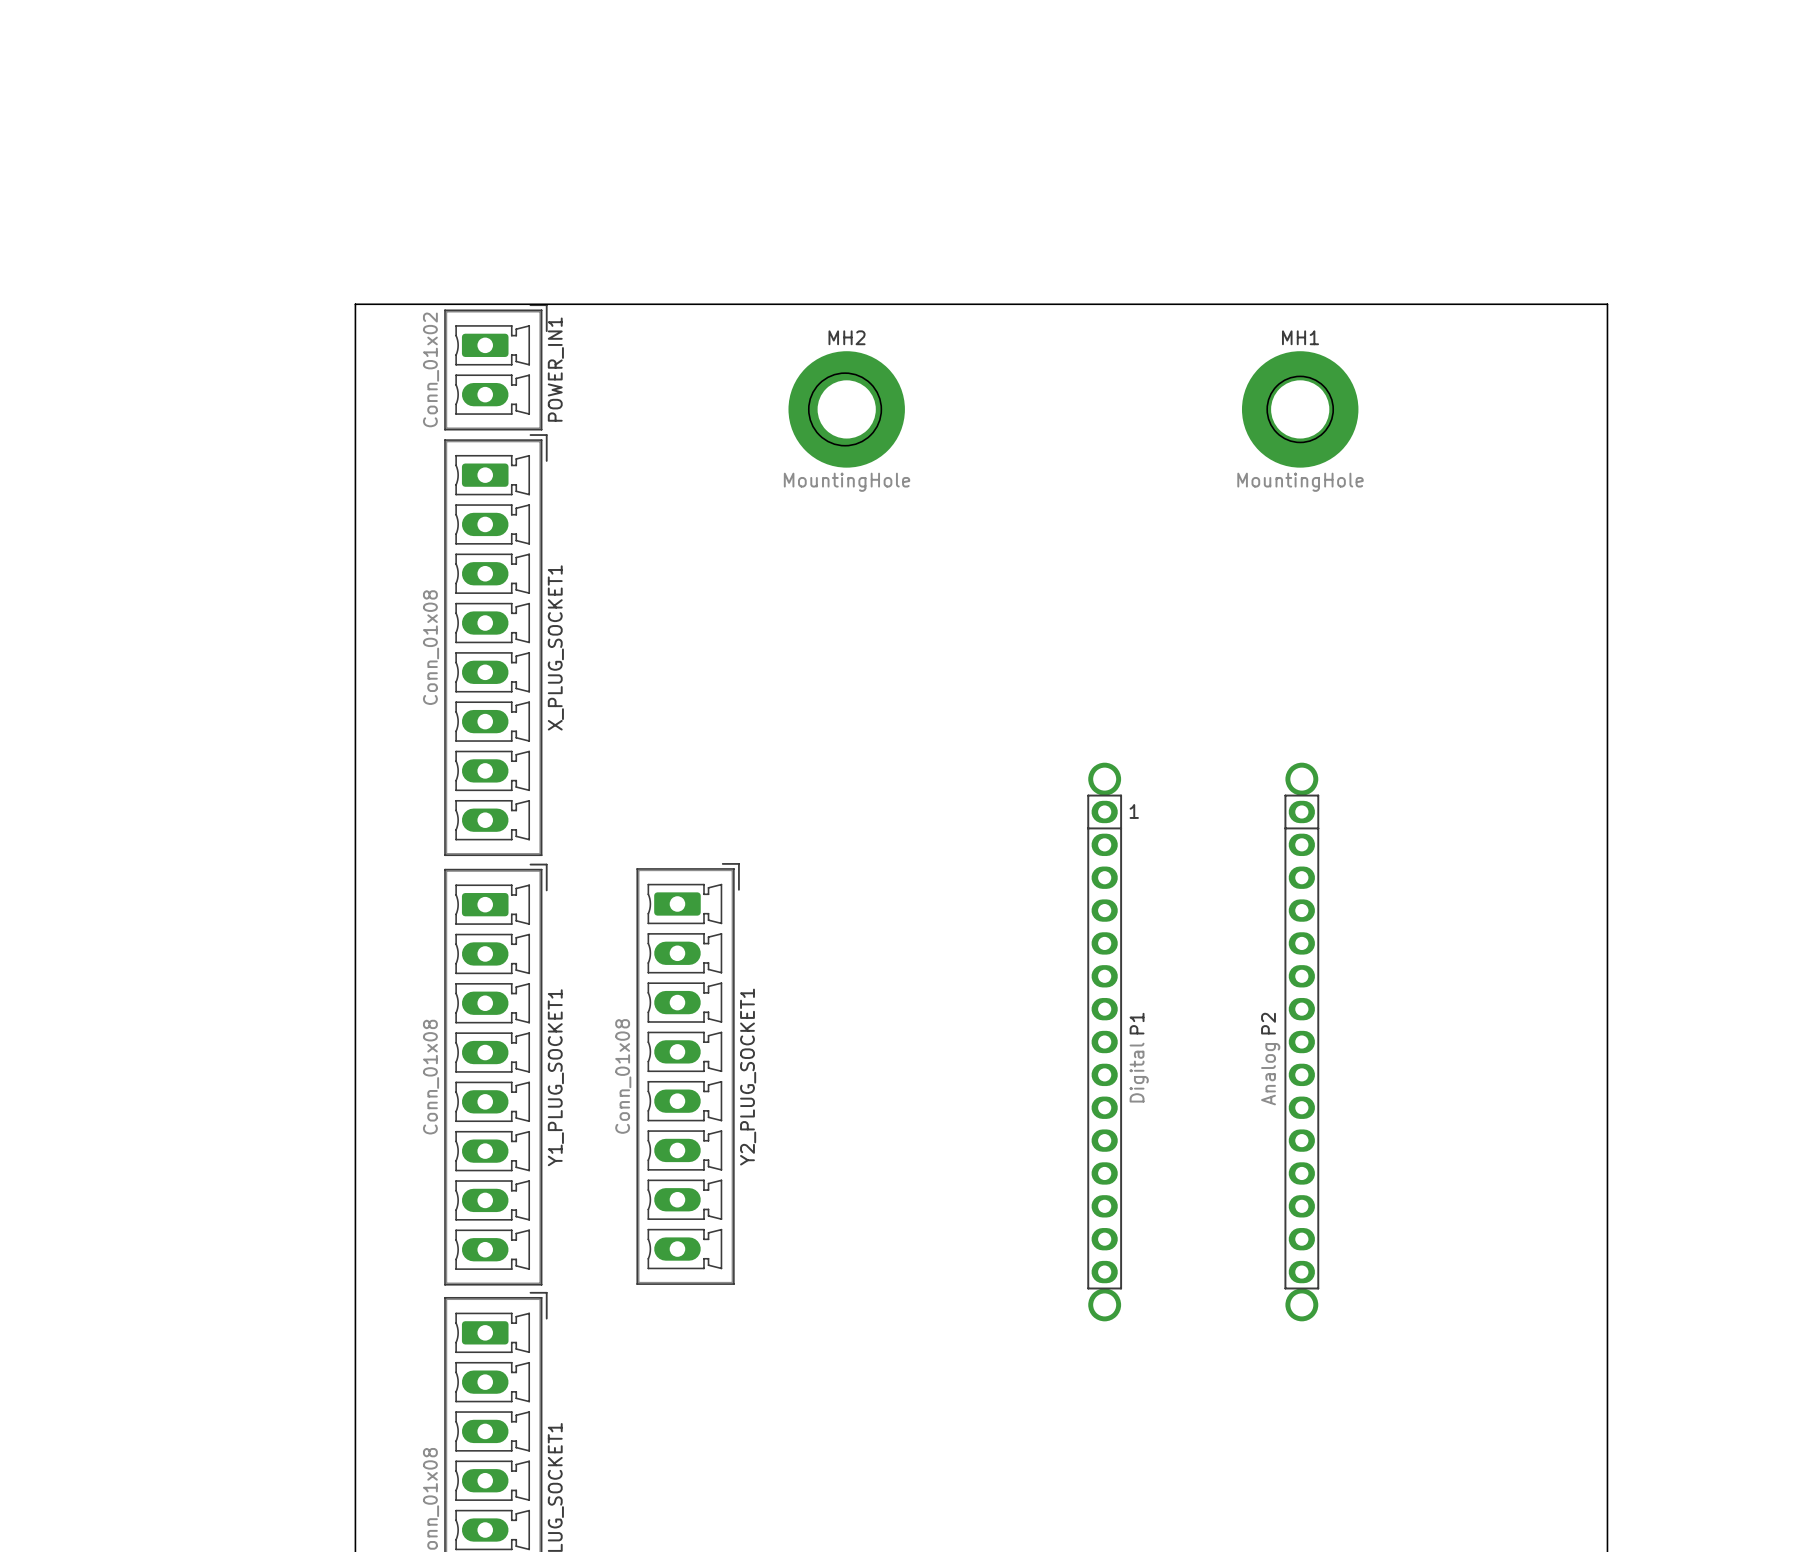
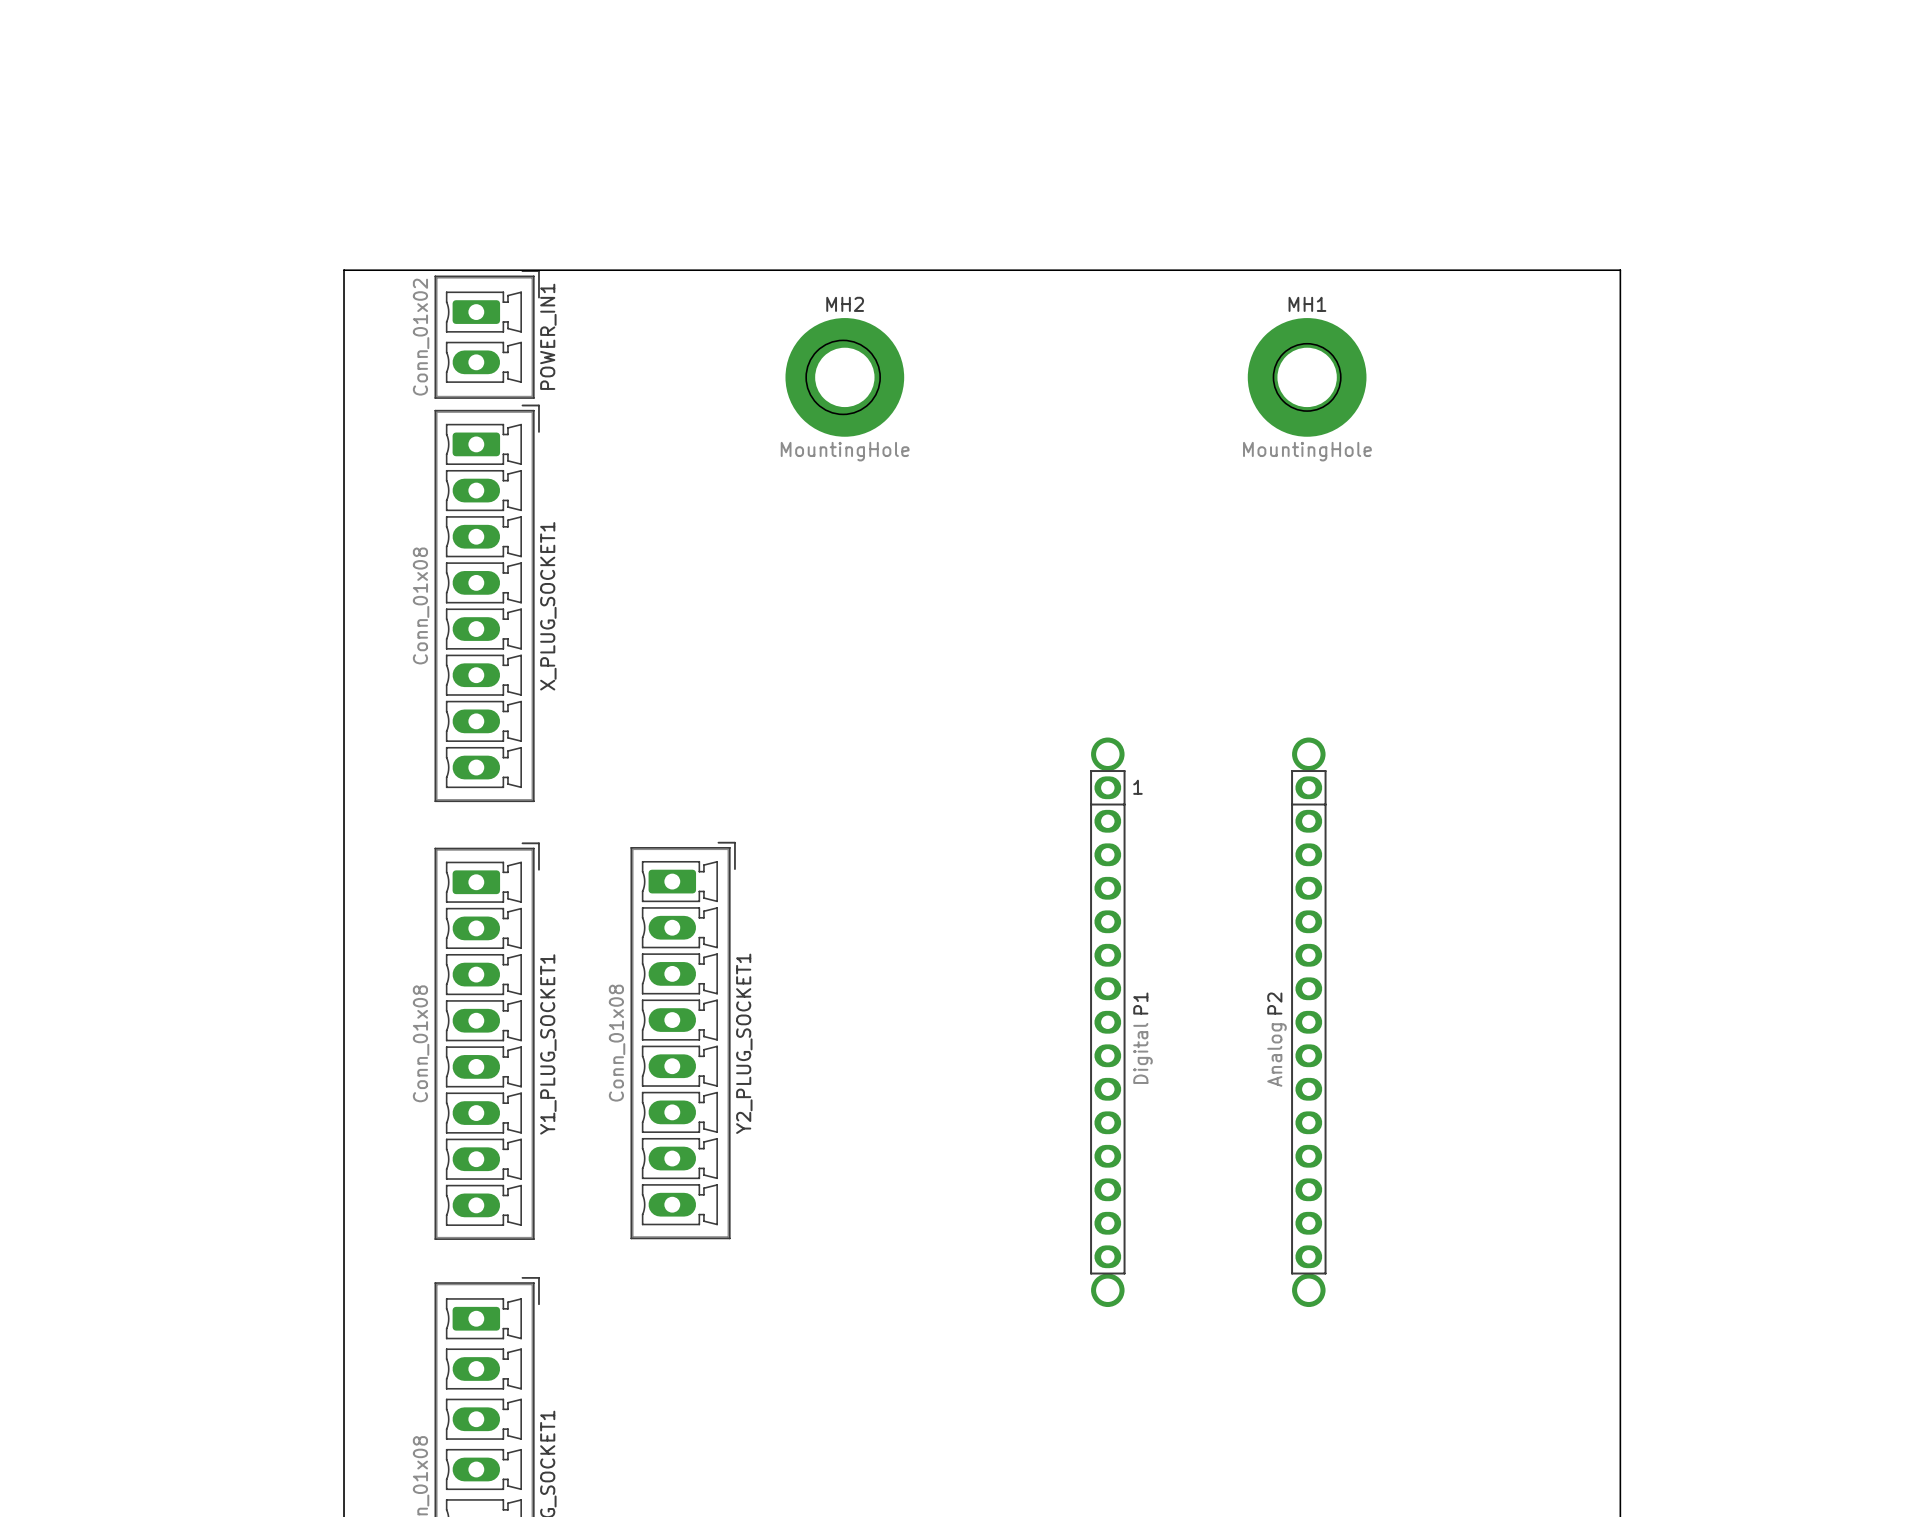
X_PLUG_SOCKET1 footprint: [444, 434, 548, 857] -> [434, 404, 540, 803]
Y1_PLUG_SOCKET1 footprint: [444, 863, 548, 1286] -> [434, 842, 540, 1240]
Y2_PLUG_SOCKET1 footprint: [636, 863, 740, 1285] -> [630, 841, 736, 1240]

